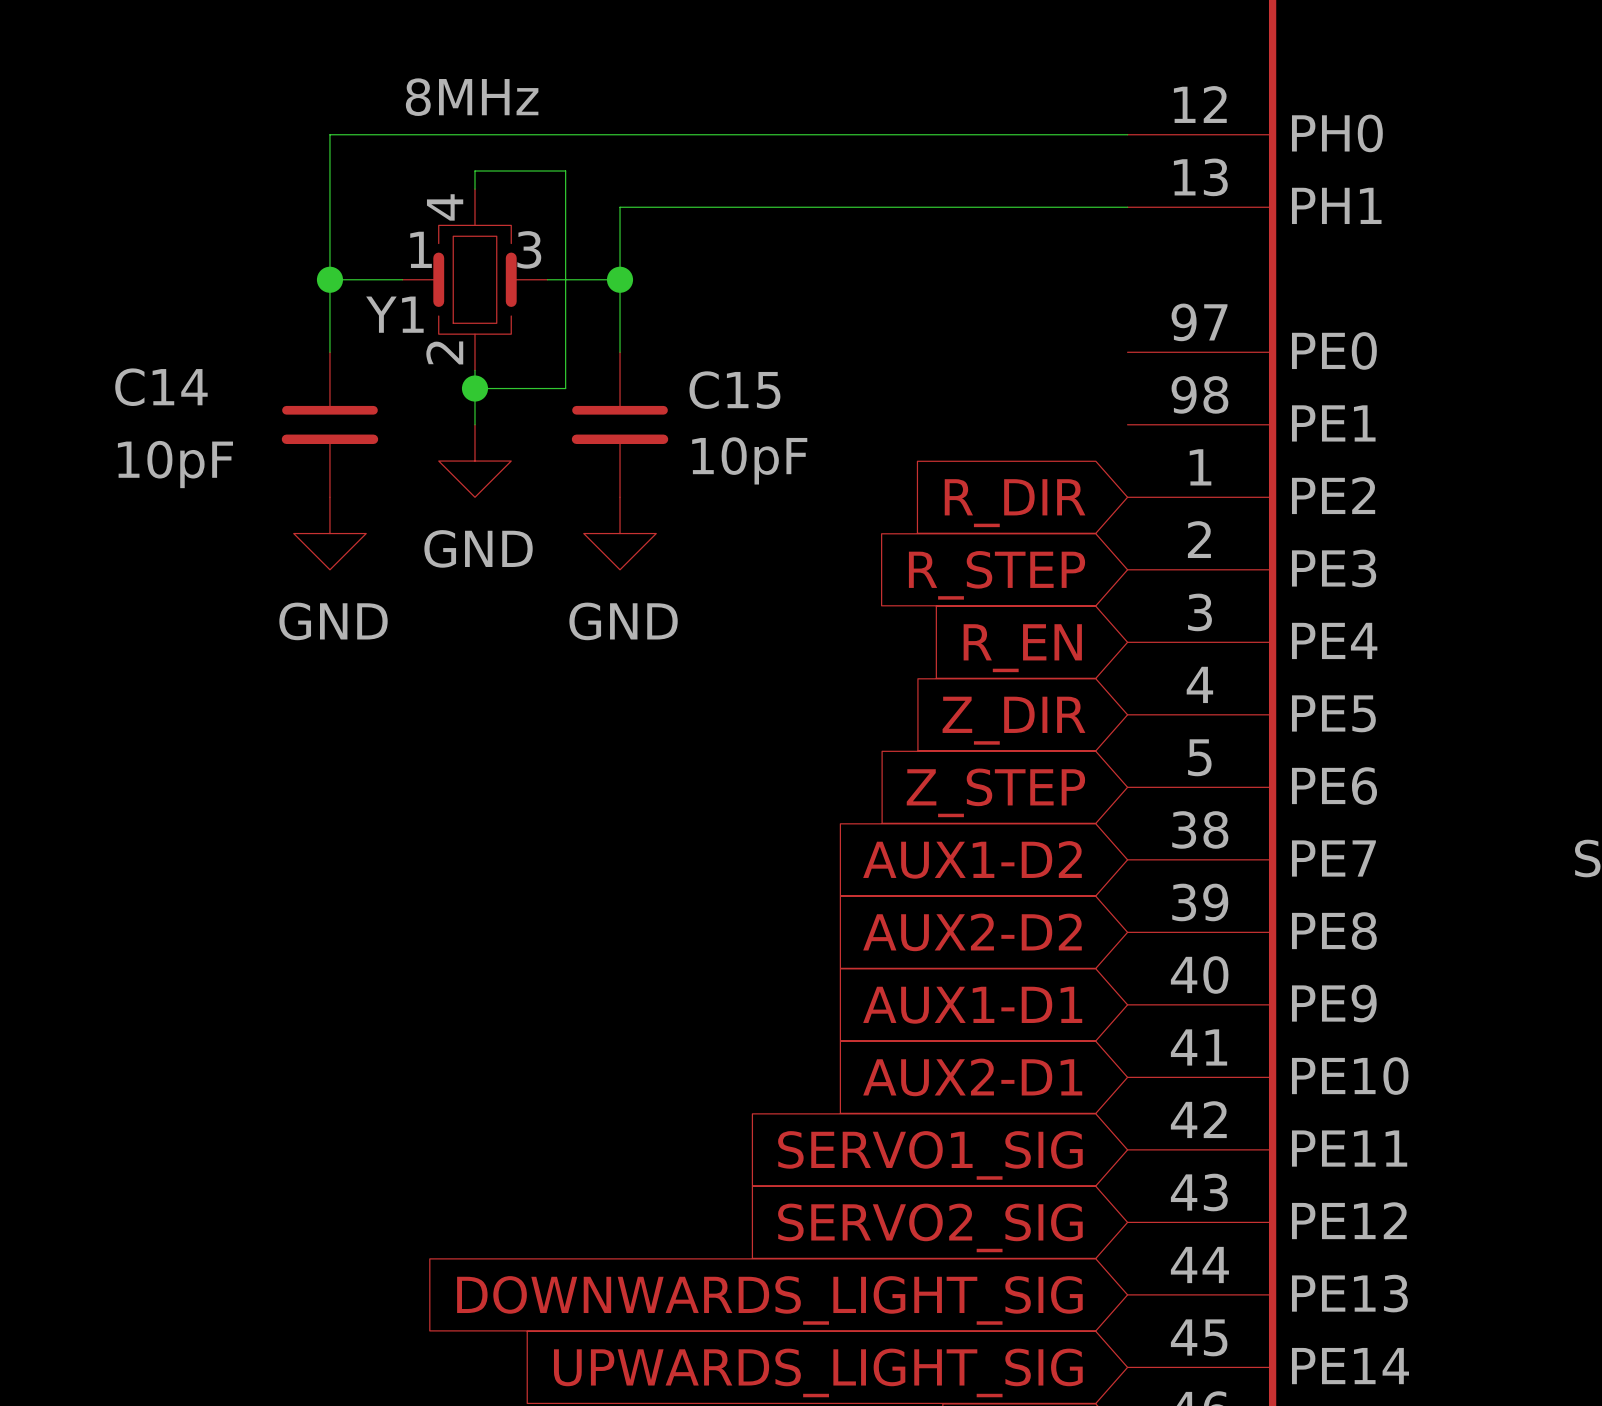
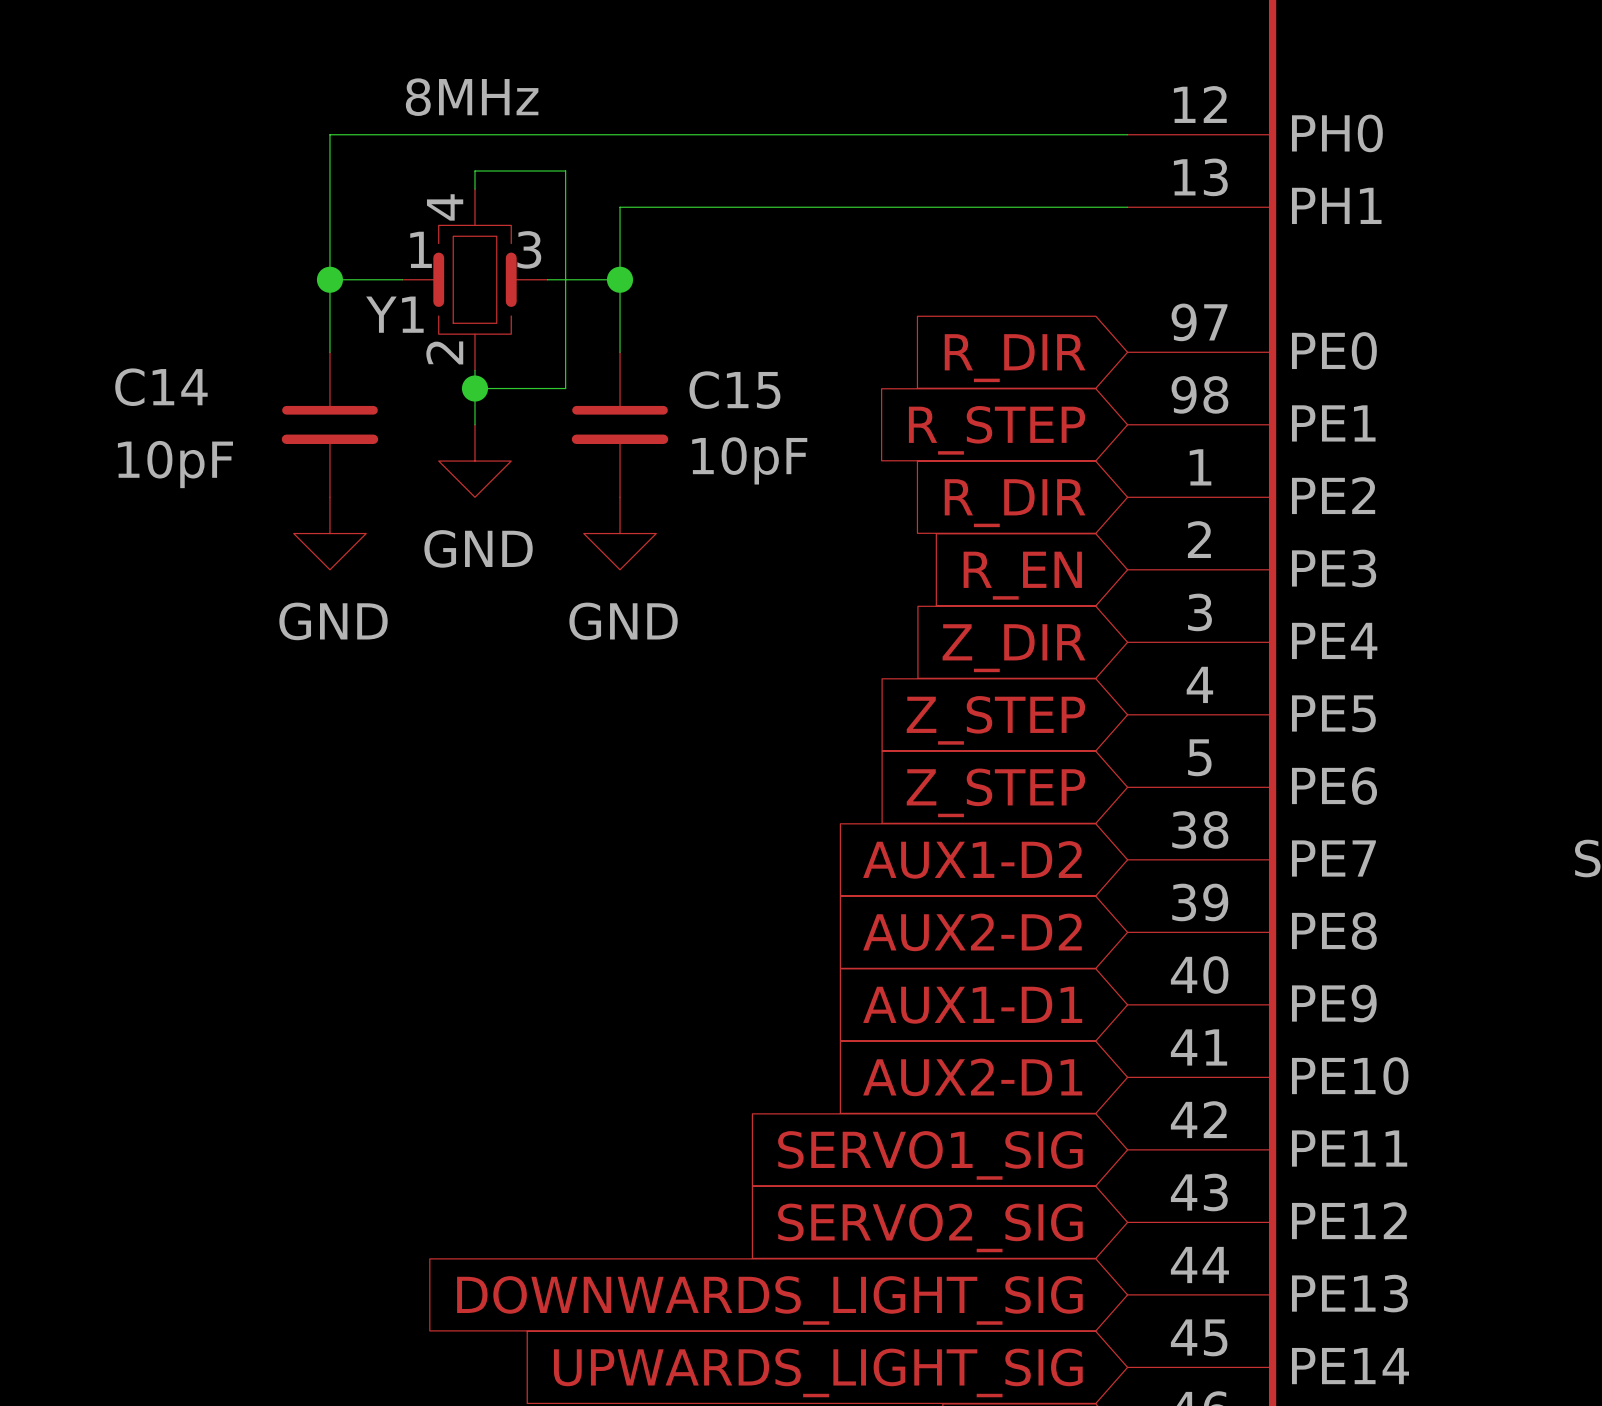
global label: none -> R_DIR (1015, 358)
global label: none -> R_STEP (997, 430)
global label: R_STEP (997, 575) -> R_EN (1022, 575)
global label: R_EN (1022, 648) -> Z_DIR (1013, 648)
global label: Z_DIR (1013, 720) -> Z_STEP (995, 720)

